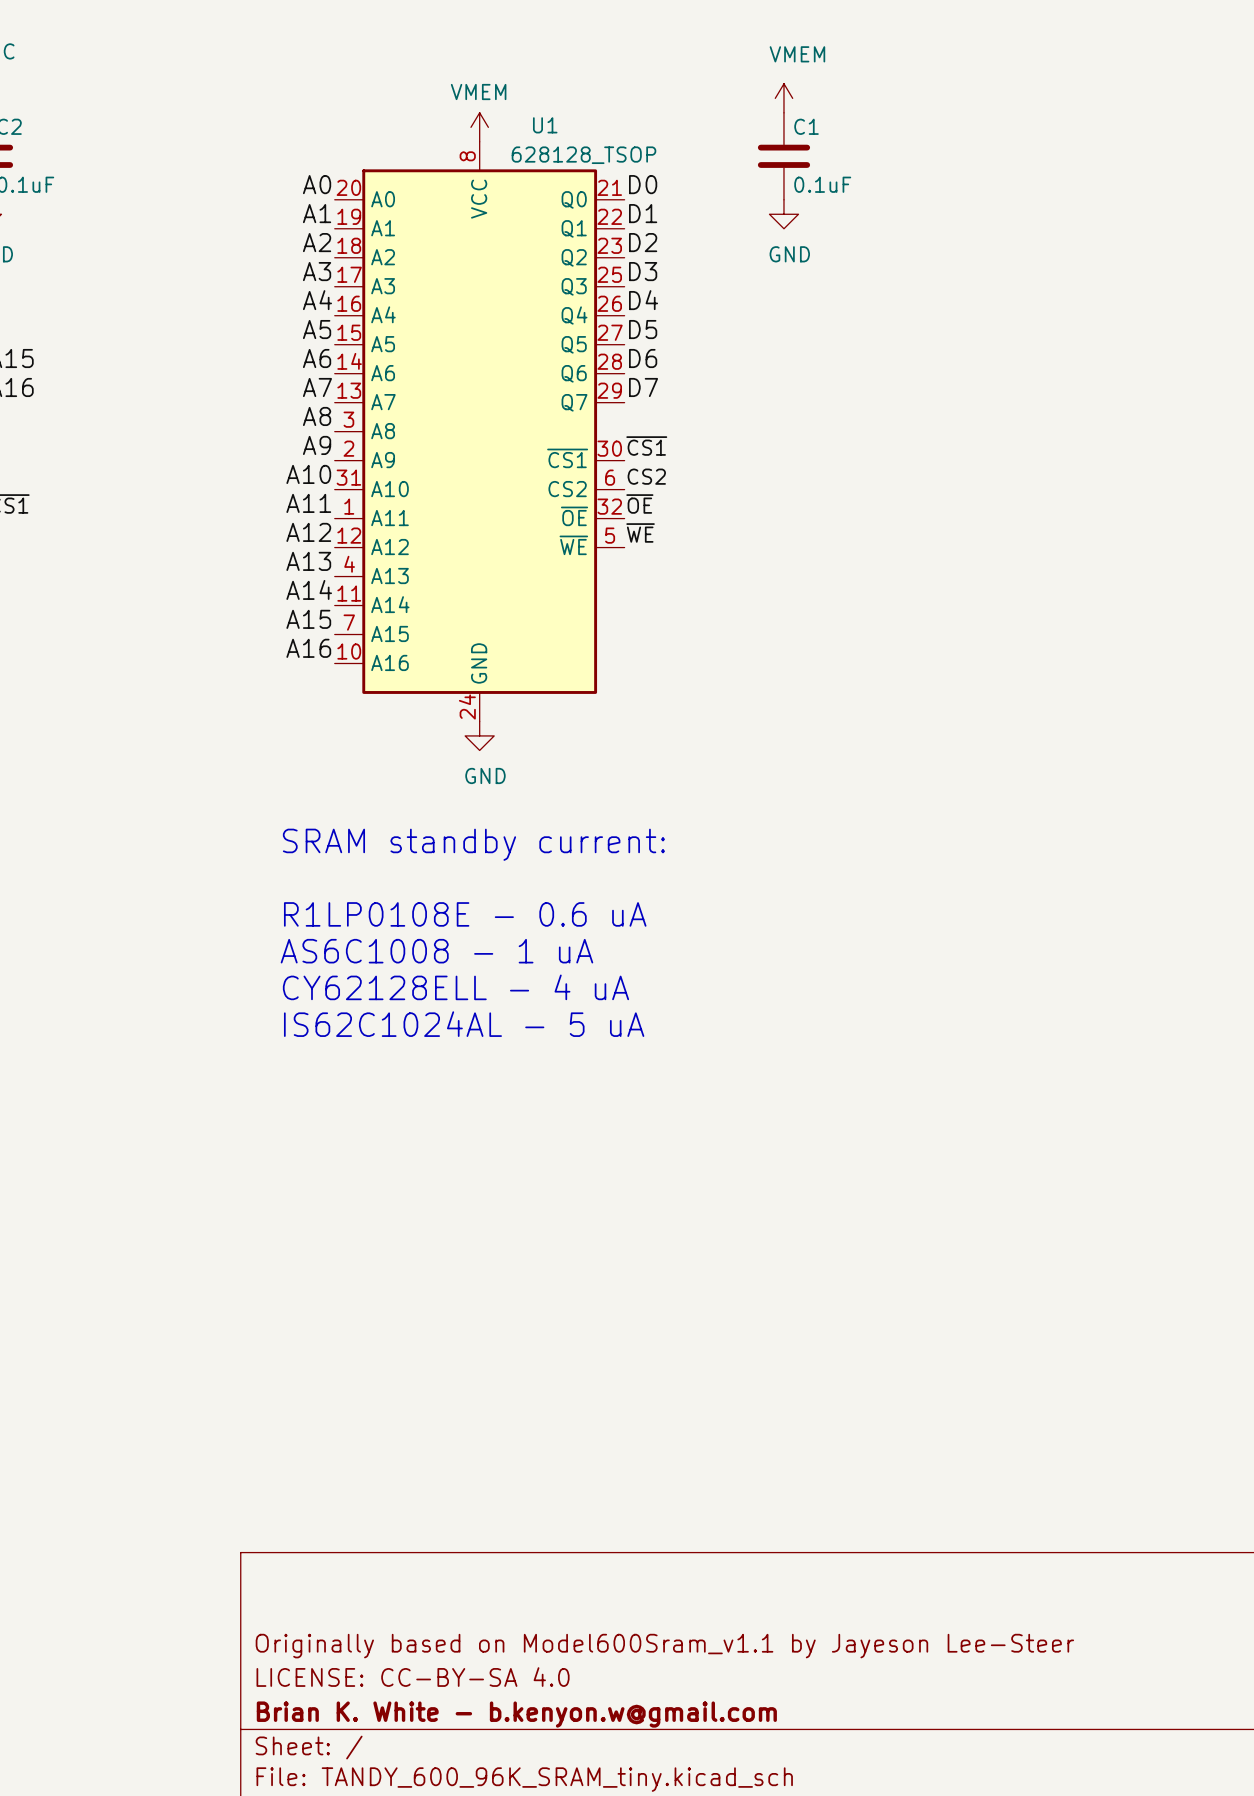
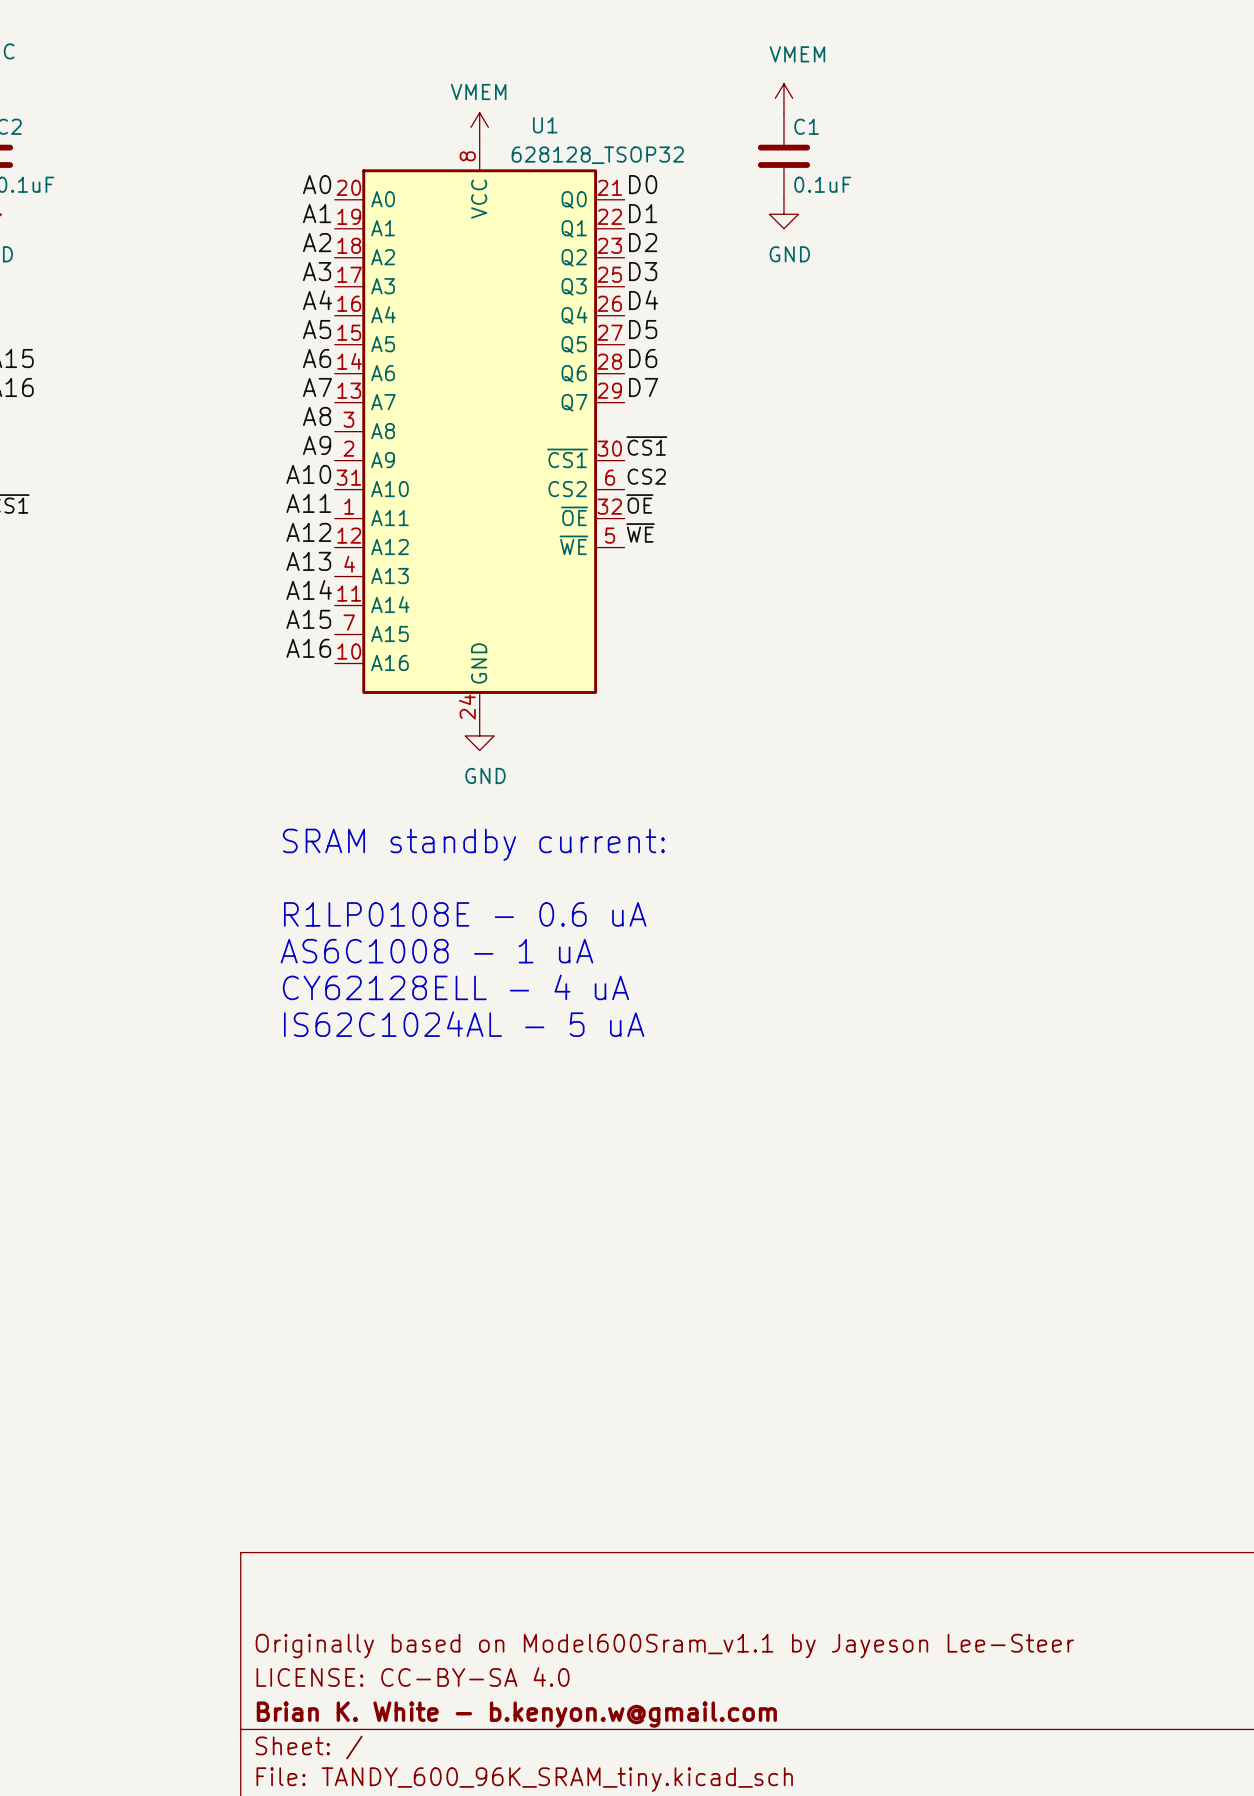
U1 value: 628128_TSOP (583, 155) -> 628128_TSOP32 (597, 155)

